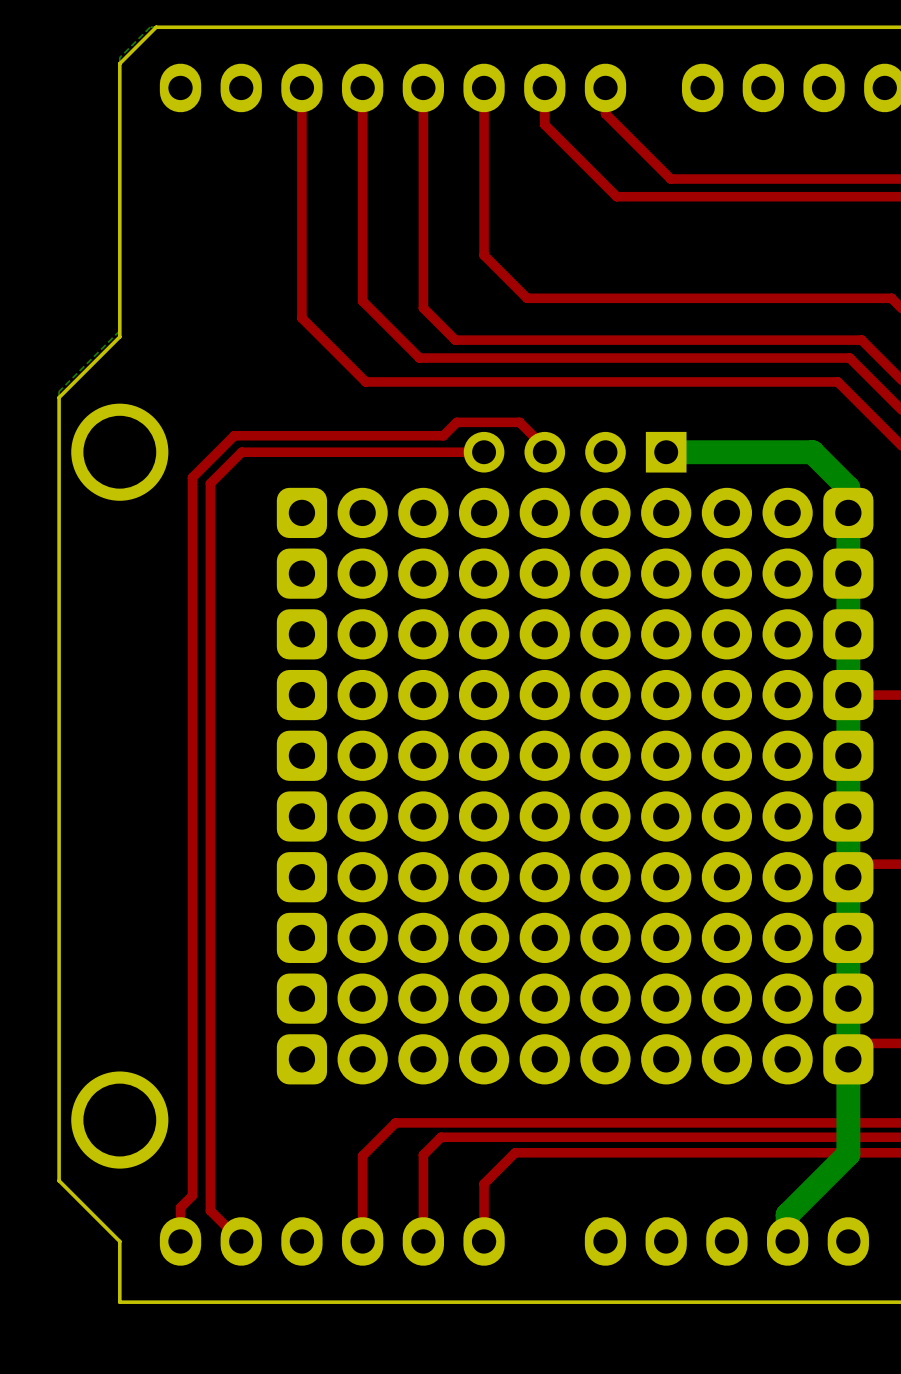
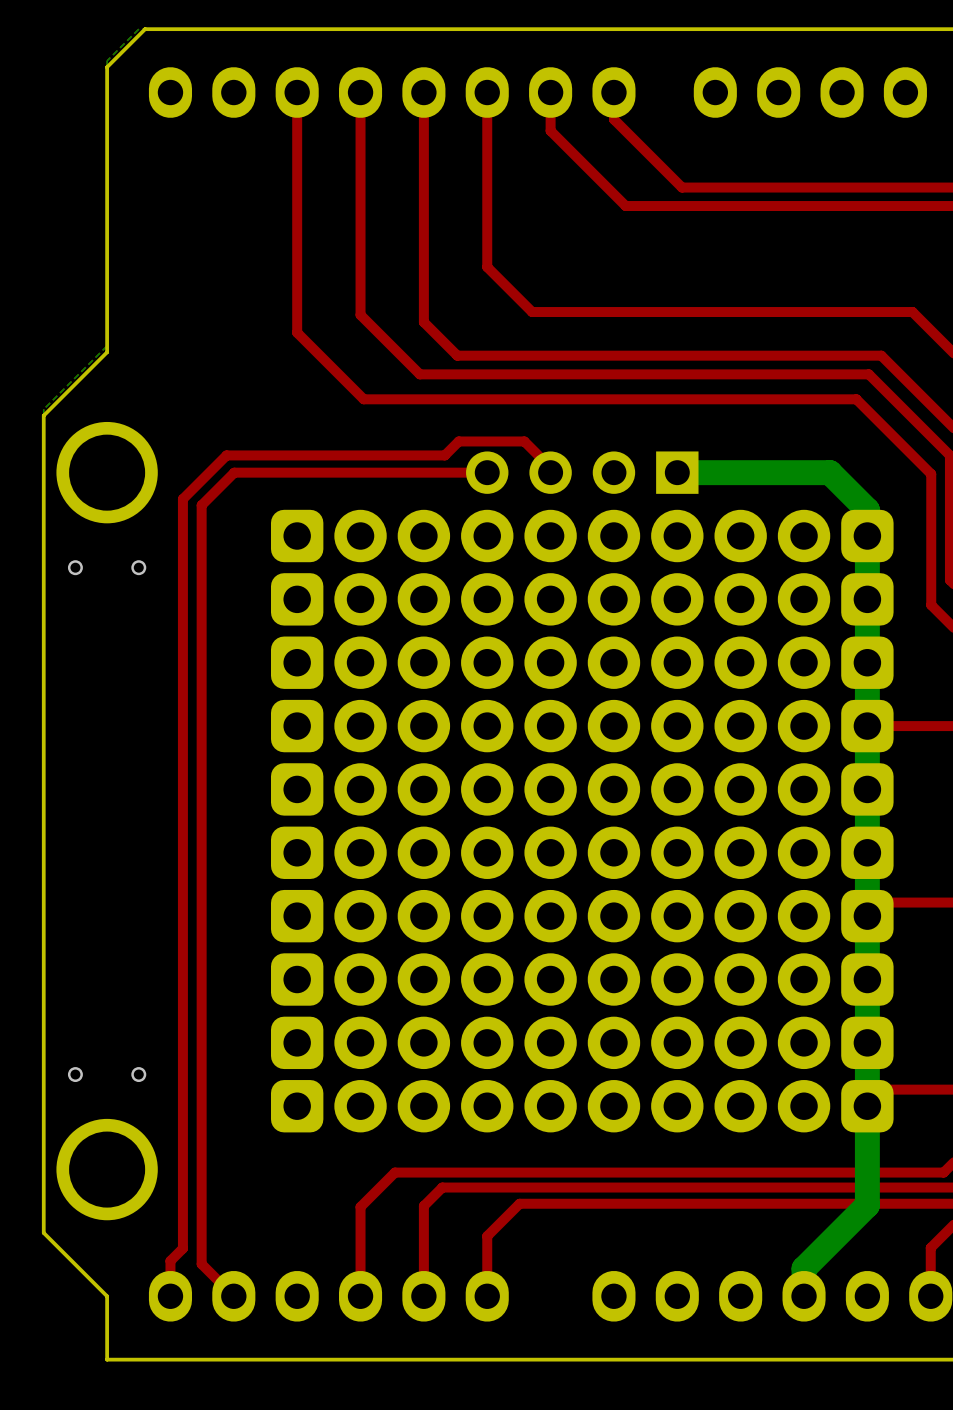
via: none -> (75, 567)
via: none -> (138, 567)
via: none -> (75, 1074)
via: none -> (138, 1074)

